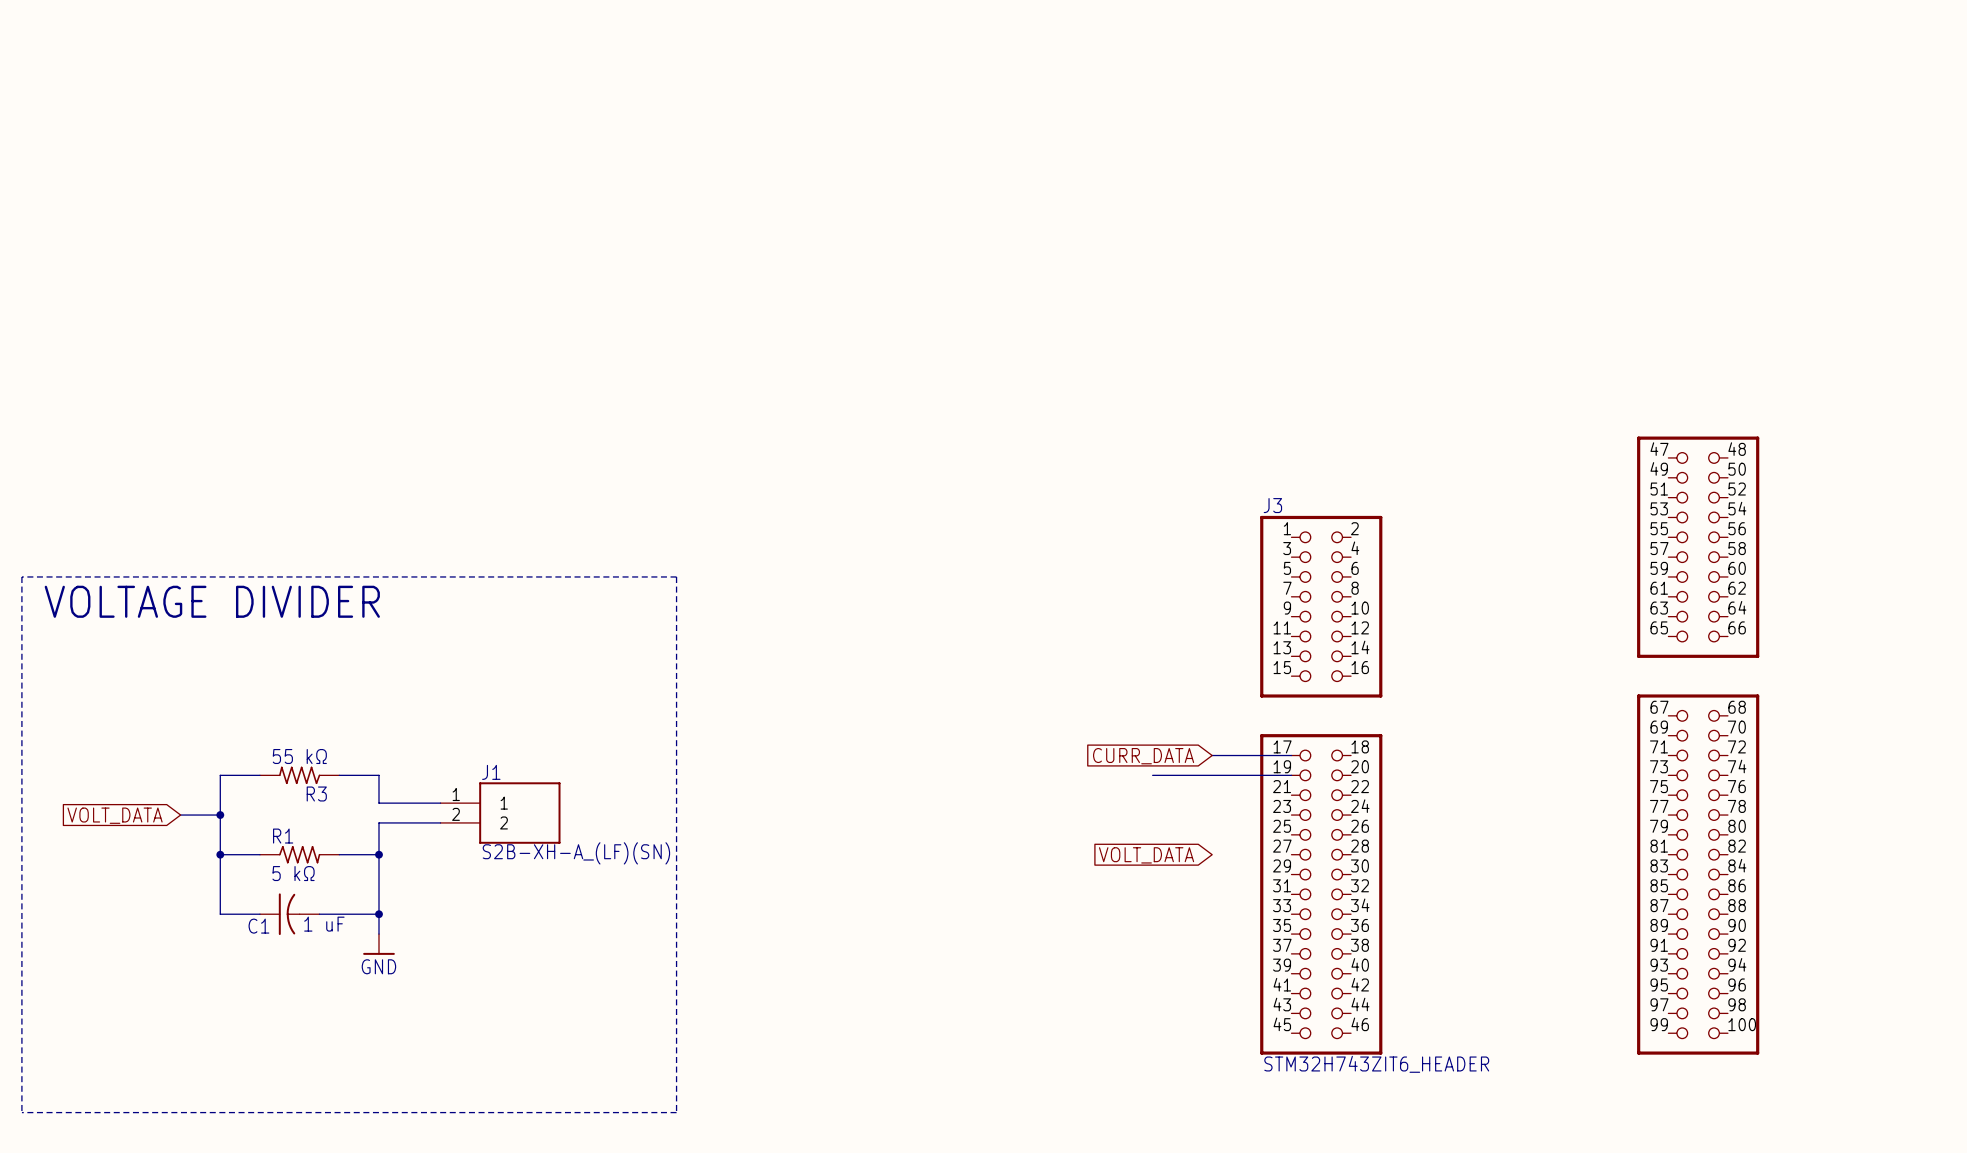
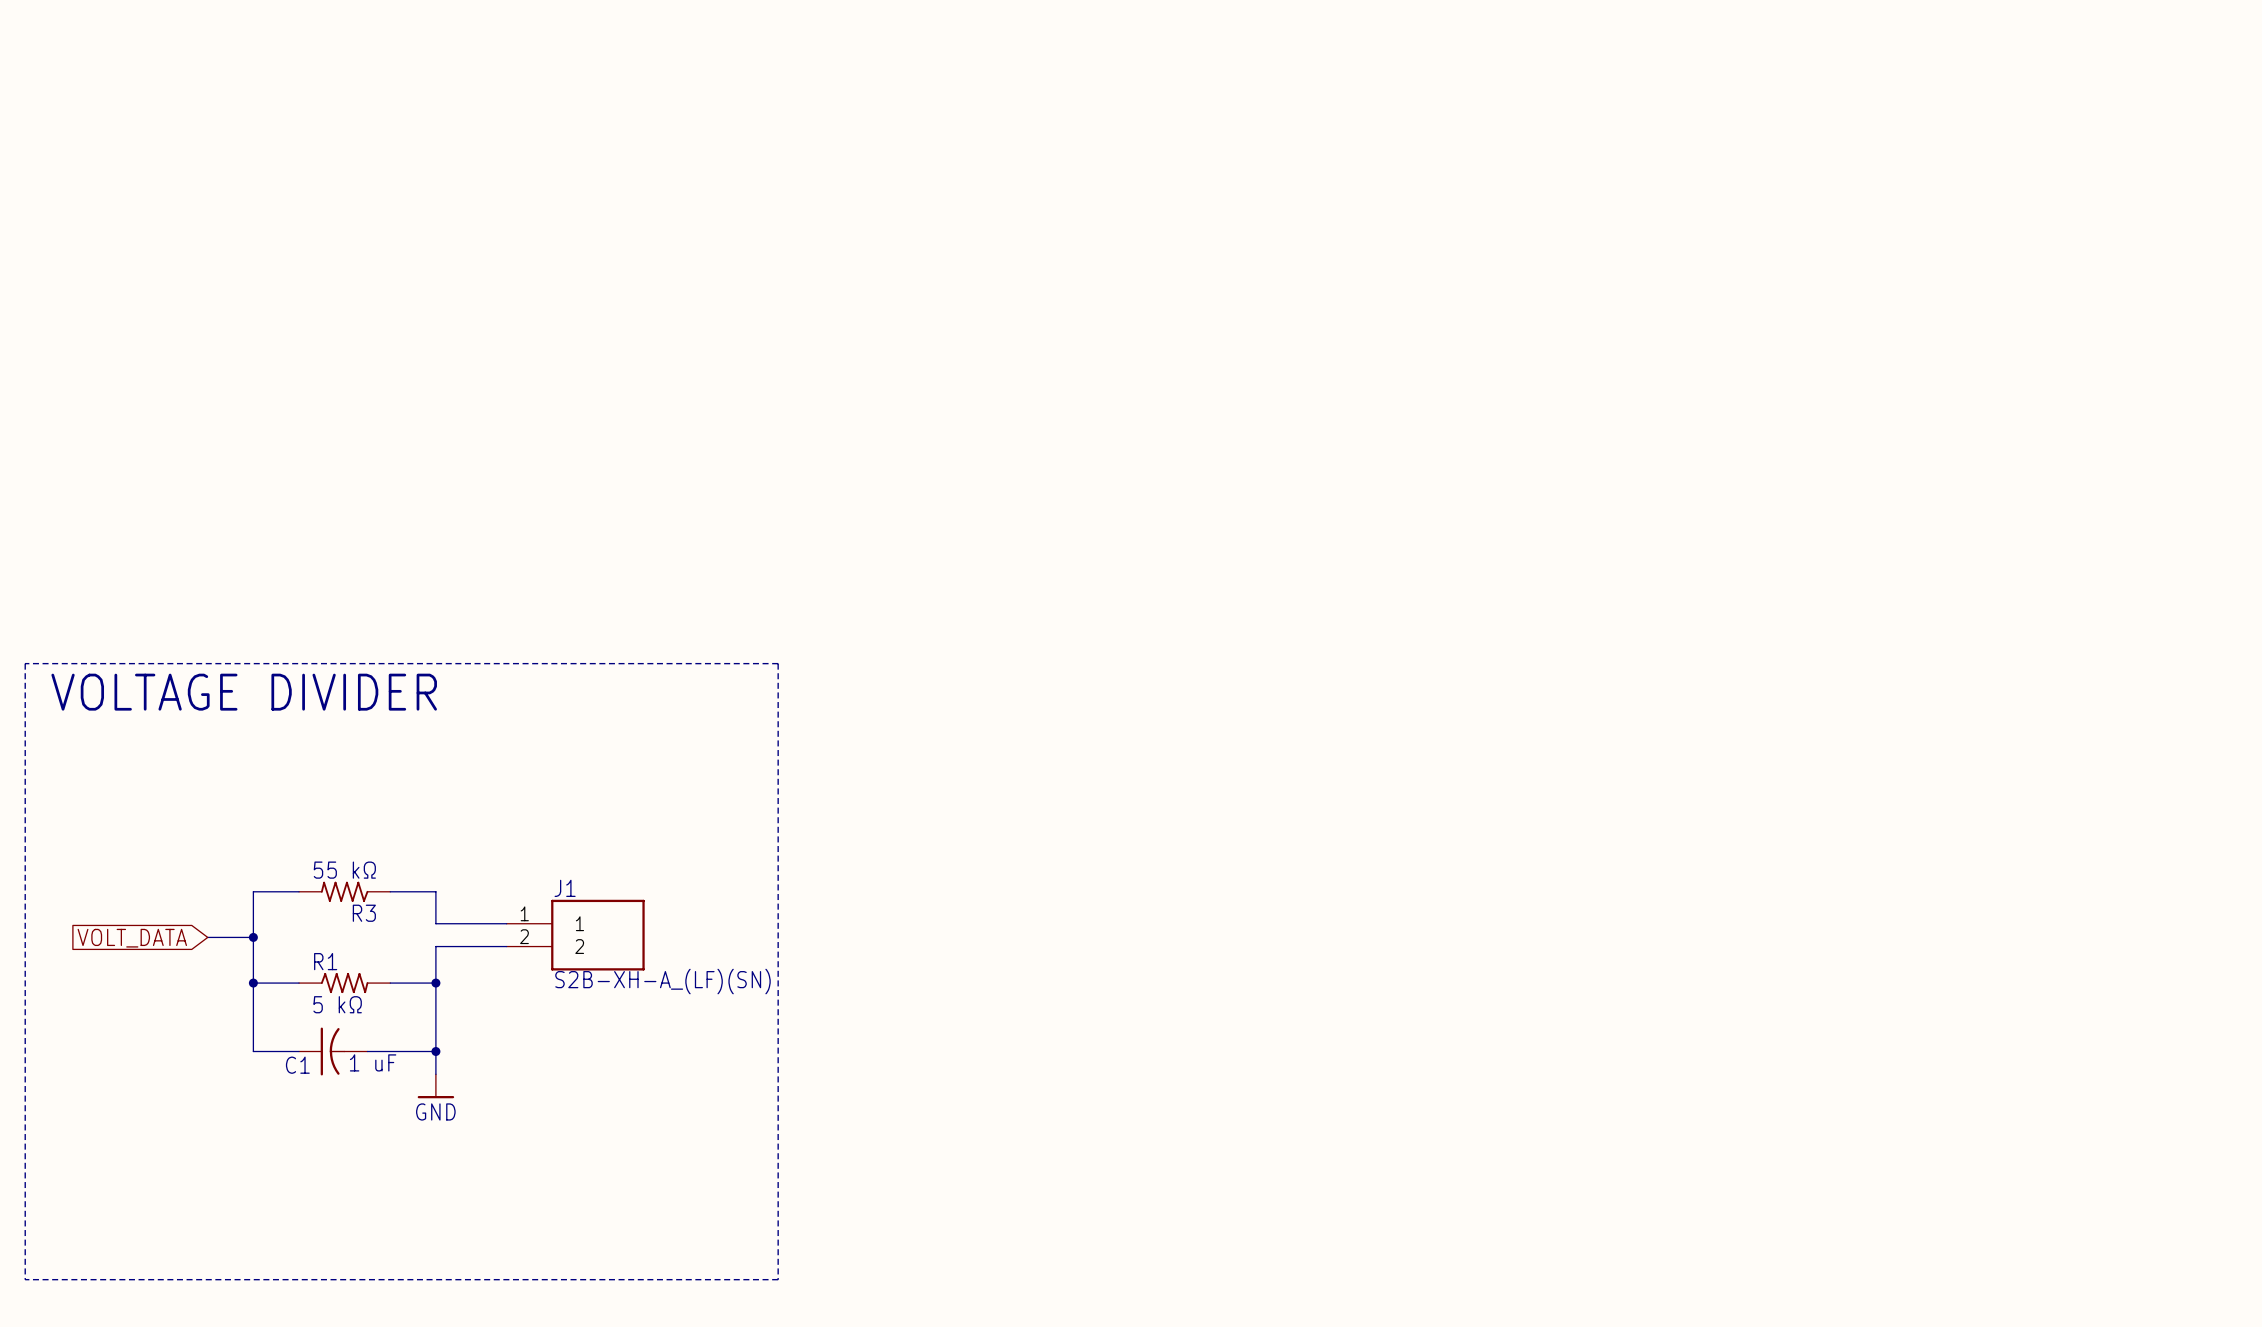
J3: STM32H743ZIT6_HEADER (1509, 745) -> none
wire: (1212, 755) (1291, 755) -> none
global label: CURR_DATA (1143, 756) -> none
wire: (1152, 775) (1291, 775) -> none
global label: VOLT_DATA (1146, 855) -> none

